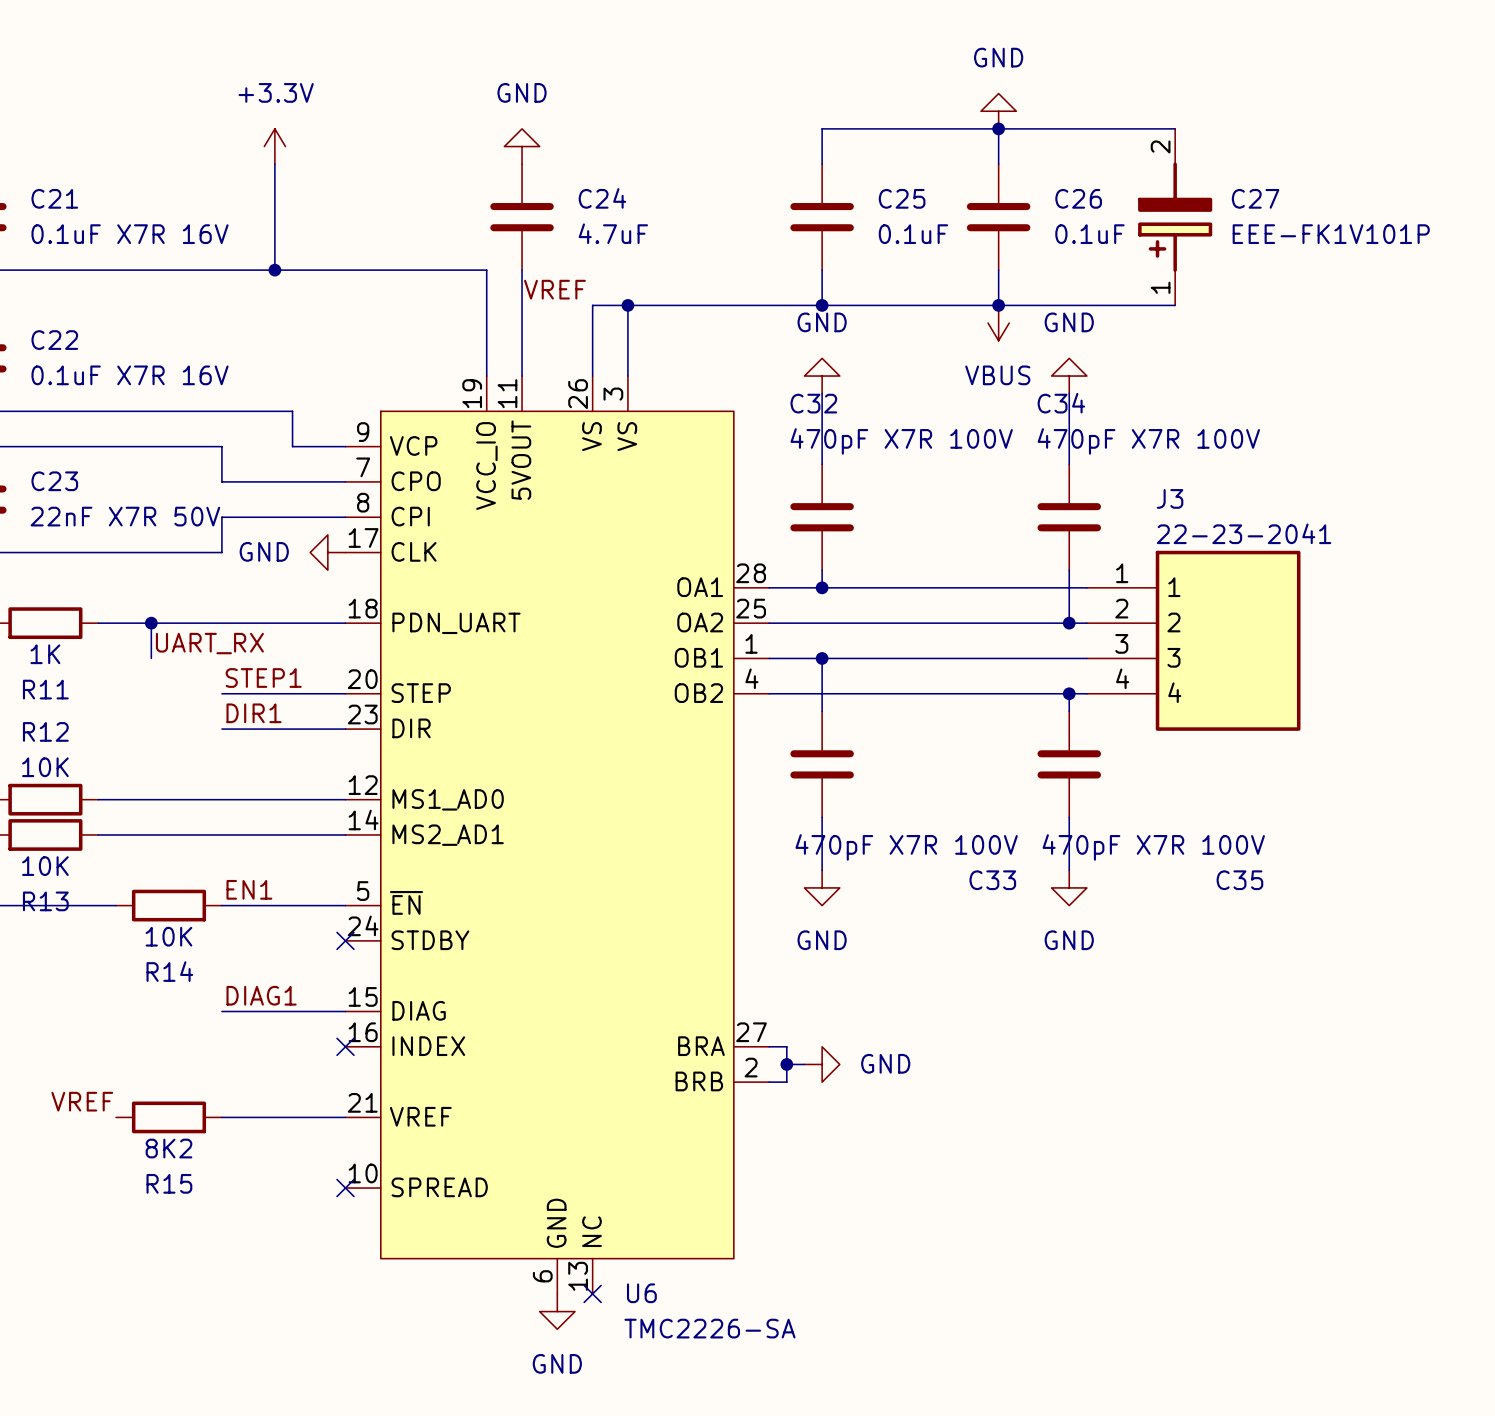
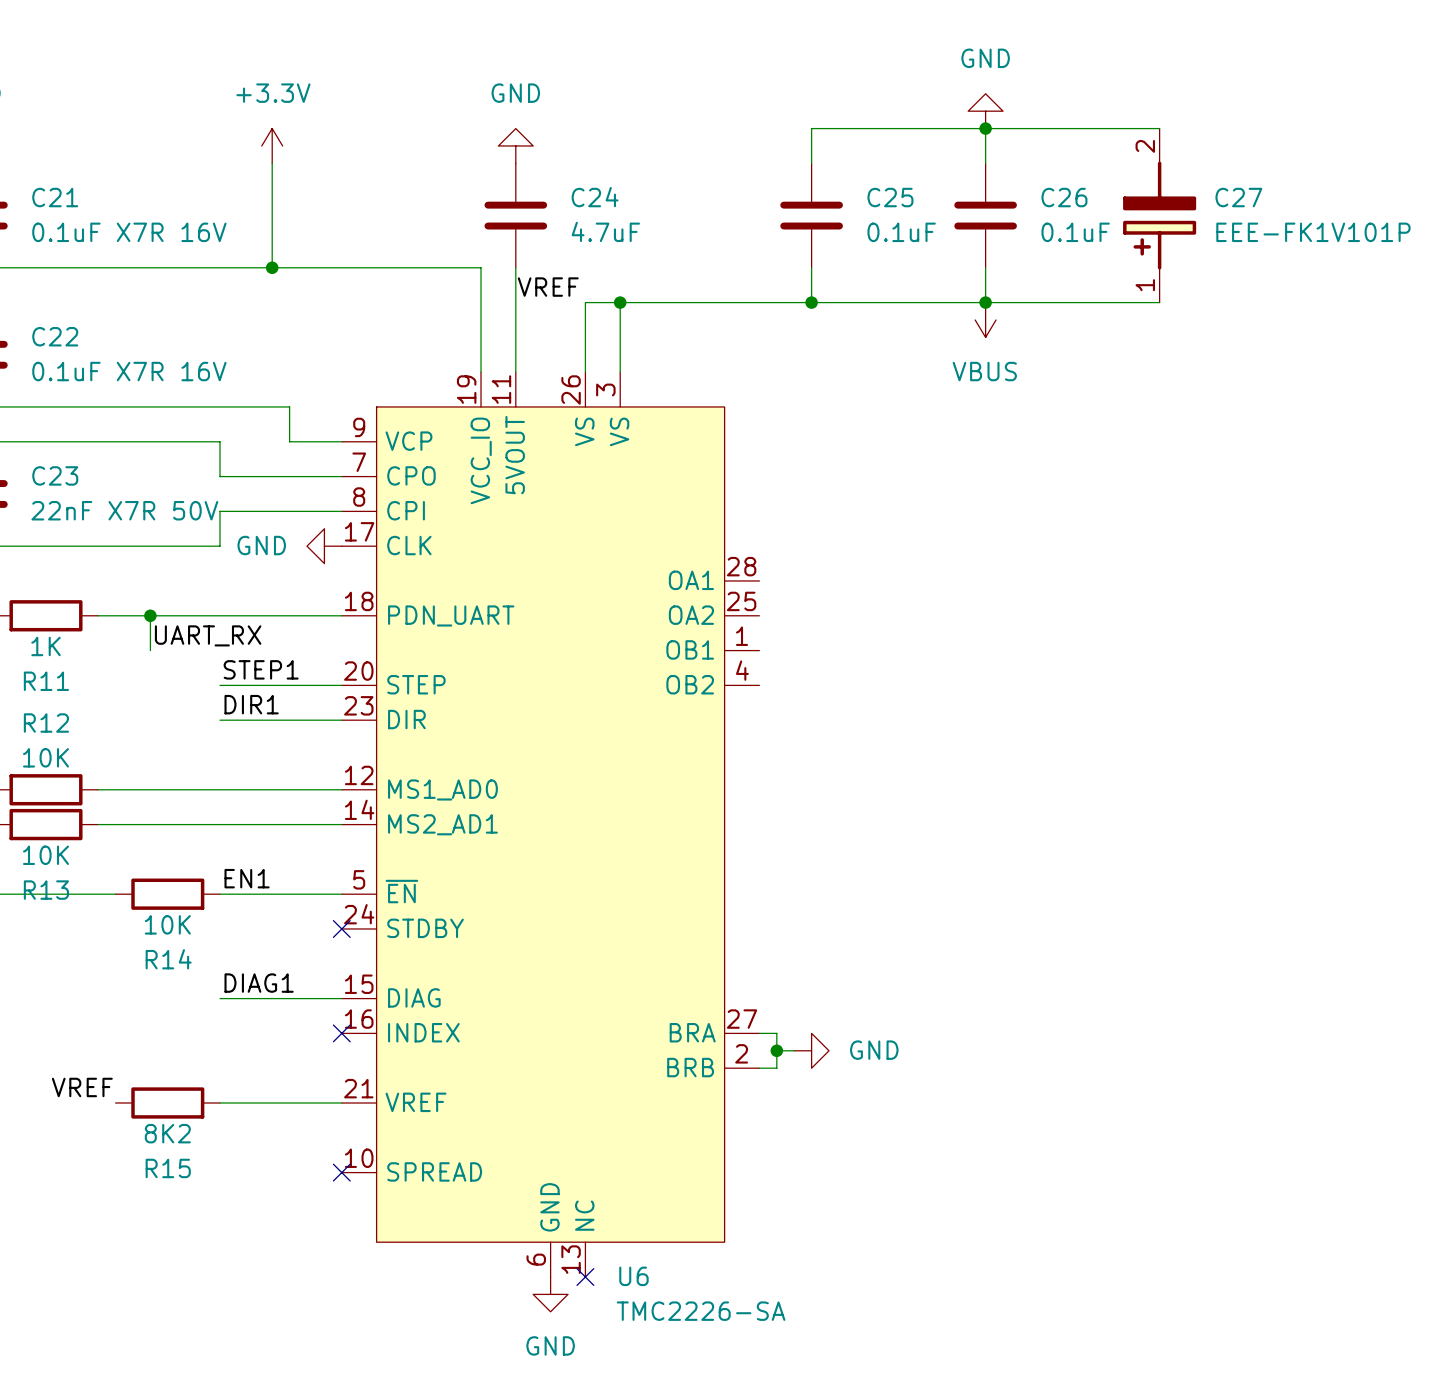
power symbol: GND (822, 376) -> none
power symbol: GND (1069, 376) -> none
wire: (822, 393) (822, 464) -> none
wire: (1069, 393) (1069, 464) -> none
C32: 470pF X7R 100V (822, 517) -> none
C34: 470pF X7R 100V (1069, 517) -> none
wire: (822, 570) (822, 587) -> none
wire: (1069, 570) (1069, 623) -> none
wire: (769, 587) (1086, 587) -> none
junction: (822, 587) -> none
wire: (769, 623) (1086, 623) -> none
junction: (1069, 623) -> none
J3: 22-23-2041 (1193, 640) -> none
wire: (769, 658) (1086, 658) -> none
wire: (822, 658) (822, 711) -> none
junction: (822, 658) -> none
wire: (769, 693) (1086, 693) -> none
wire: (1069, 693) (1069, 711) -> none
junction: (1069, 693) -> none
C33: 470pF X7R 100V (822, 764) -> none
C35: 470pF X7R 100V (1069, 764) -> none
wire: (822, 817) (822, 870) -> none
wire: (1069, 817) (1069, 870) -> none
power symbol: GND (822, 887) -> none
power symbol: GND (1069, 887) -> none

